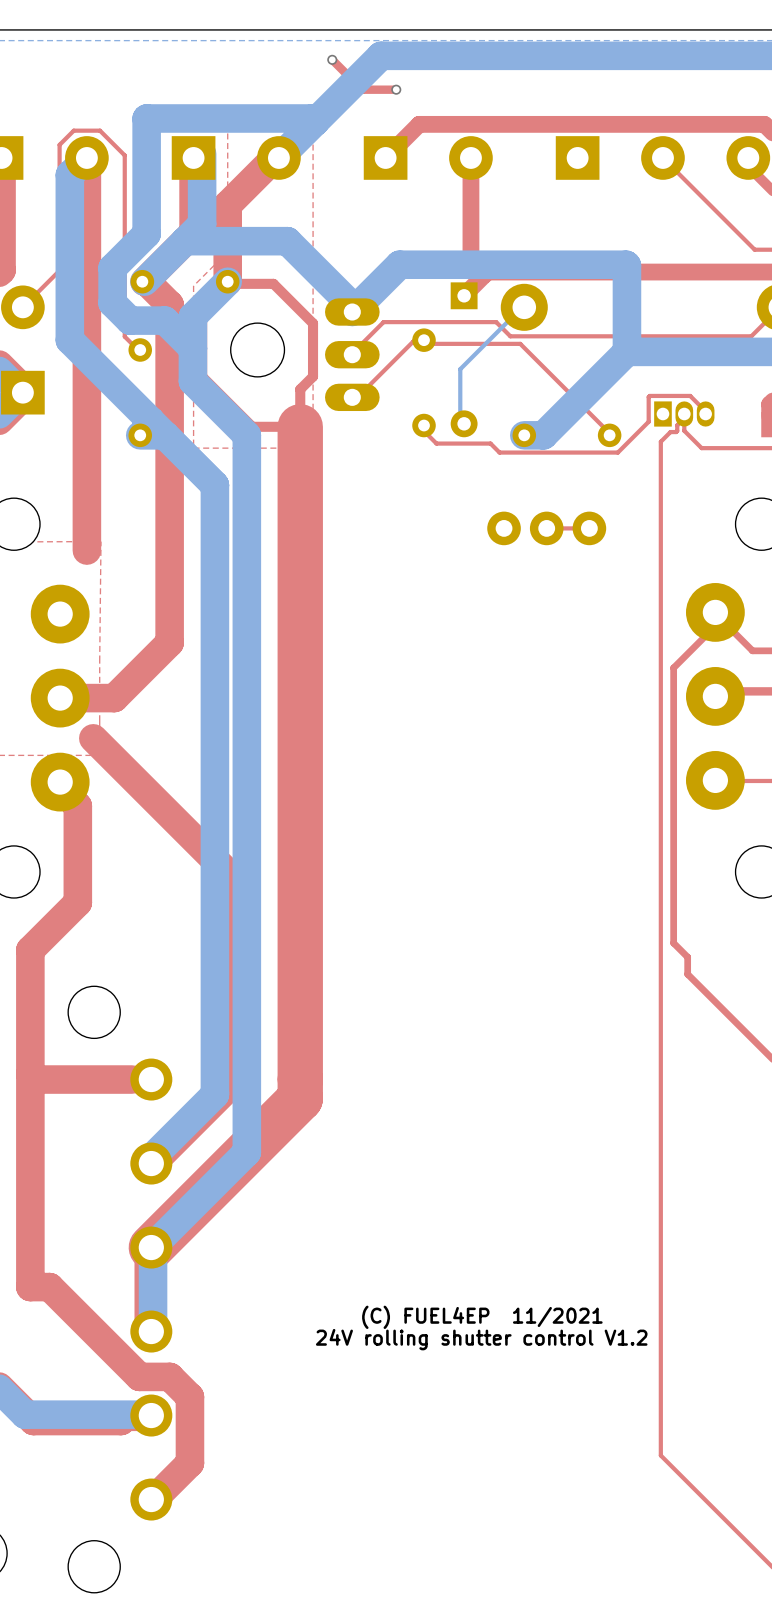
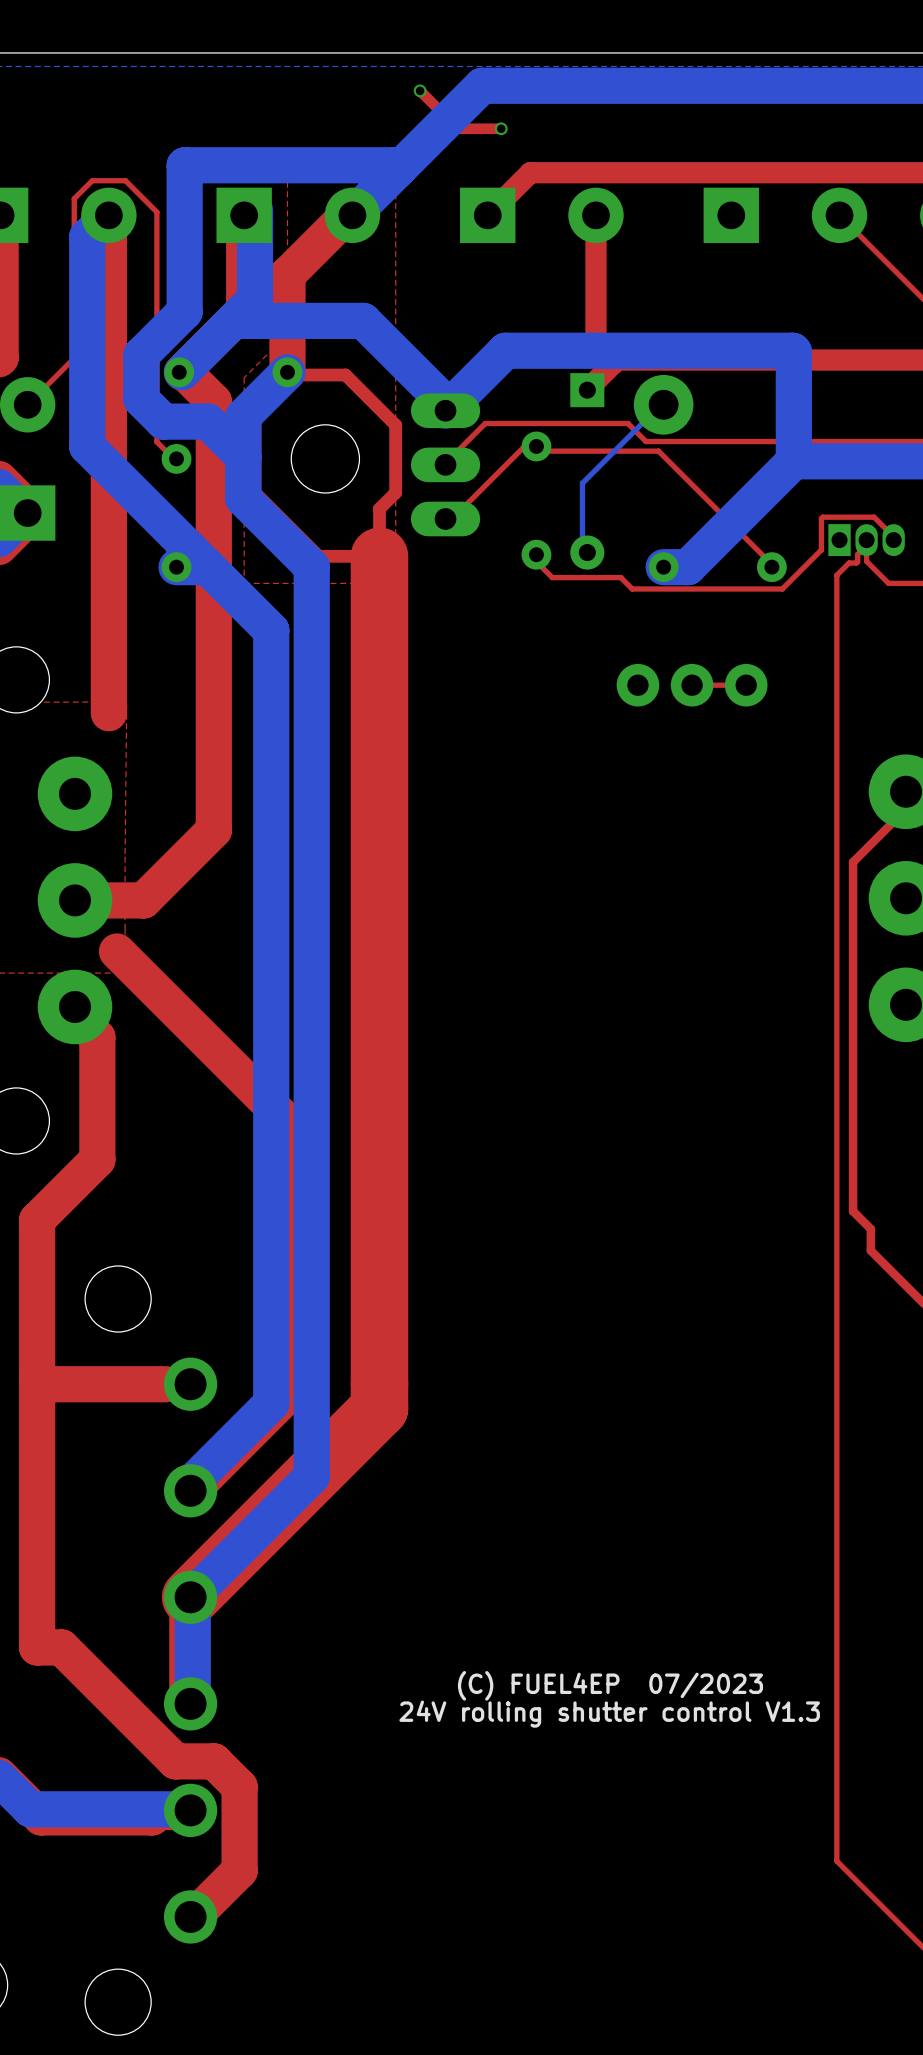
text: (C) FUEL4EP 11/2021 (482, 1317) -> (C) FUEL4EP 07/2023 (610, 1685)
text: 24V rolling shutter control V1.2 (481, 1339) -> 24V rolling shutter control V1.3 (609, 1714)

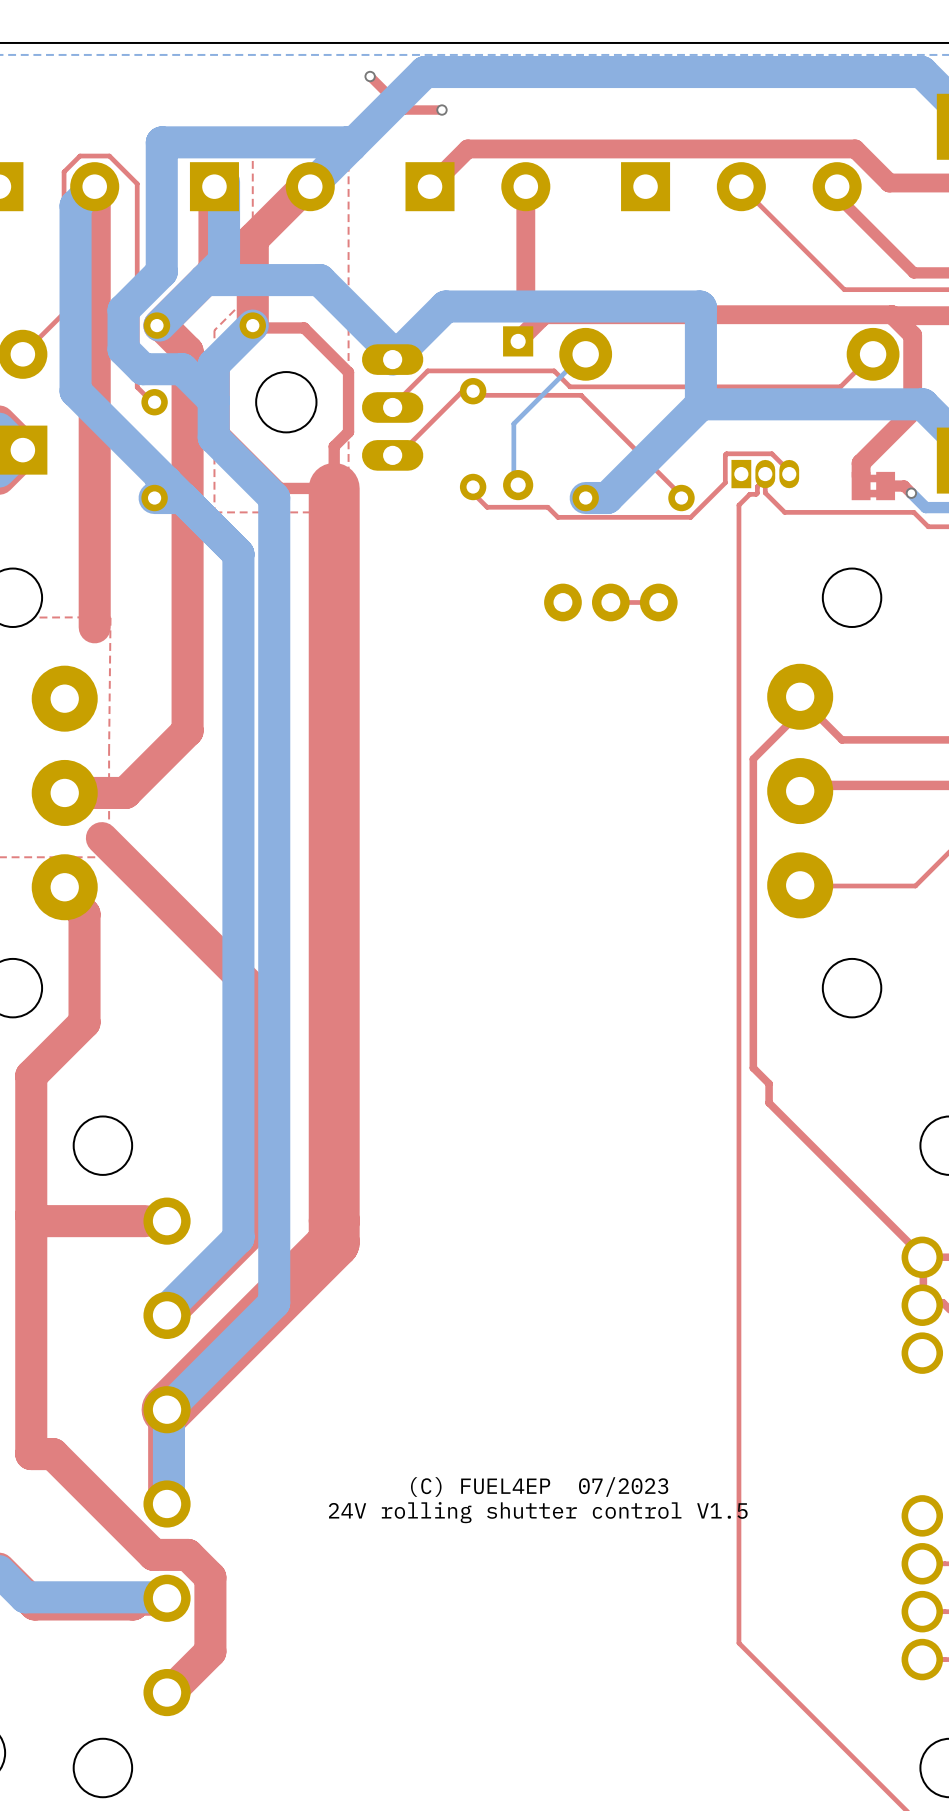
text: 24V rolling shutter control V1.3 (609, 1714) -> 24V rolling shutter control V1.5 (538, 1512)

